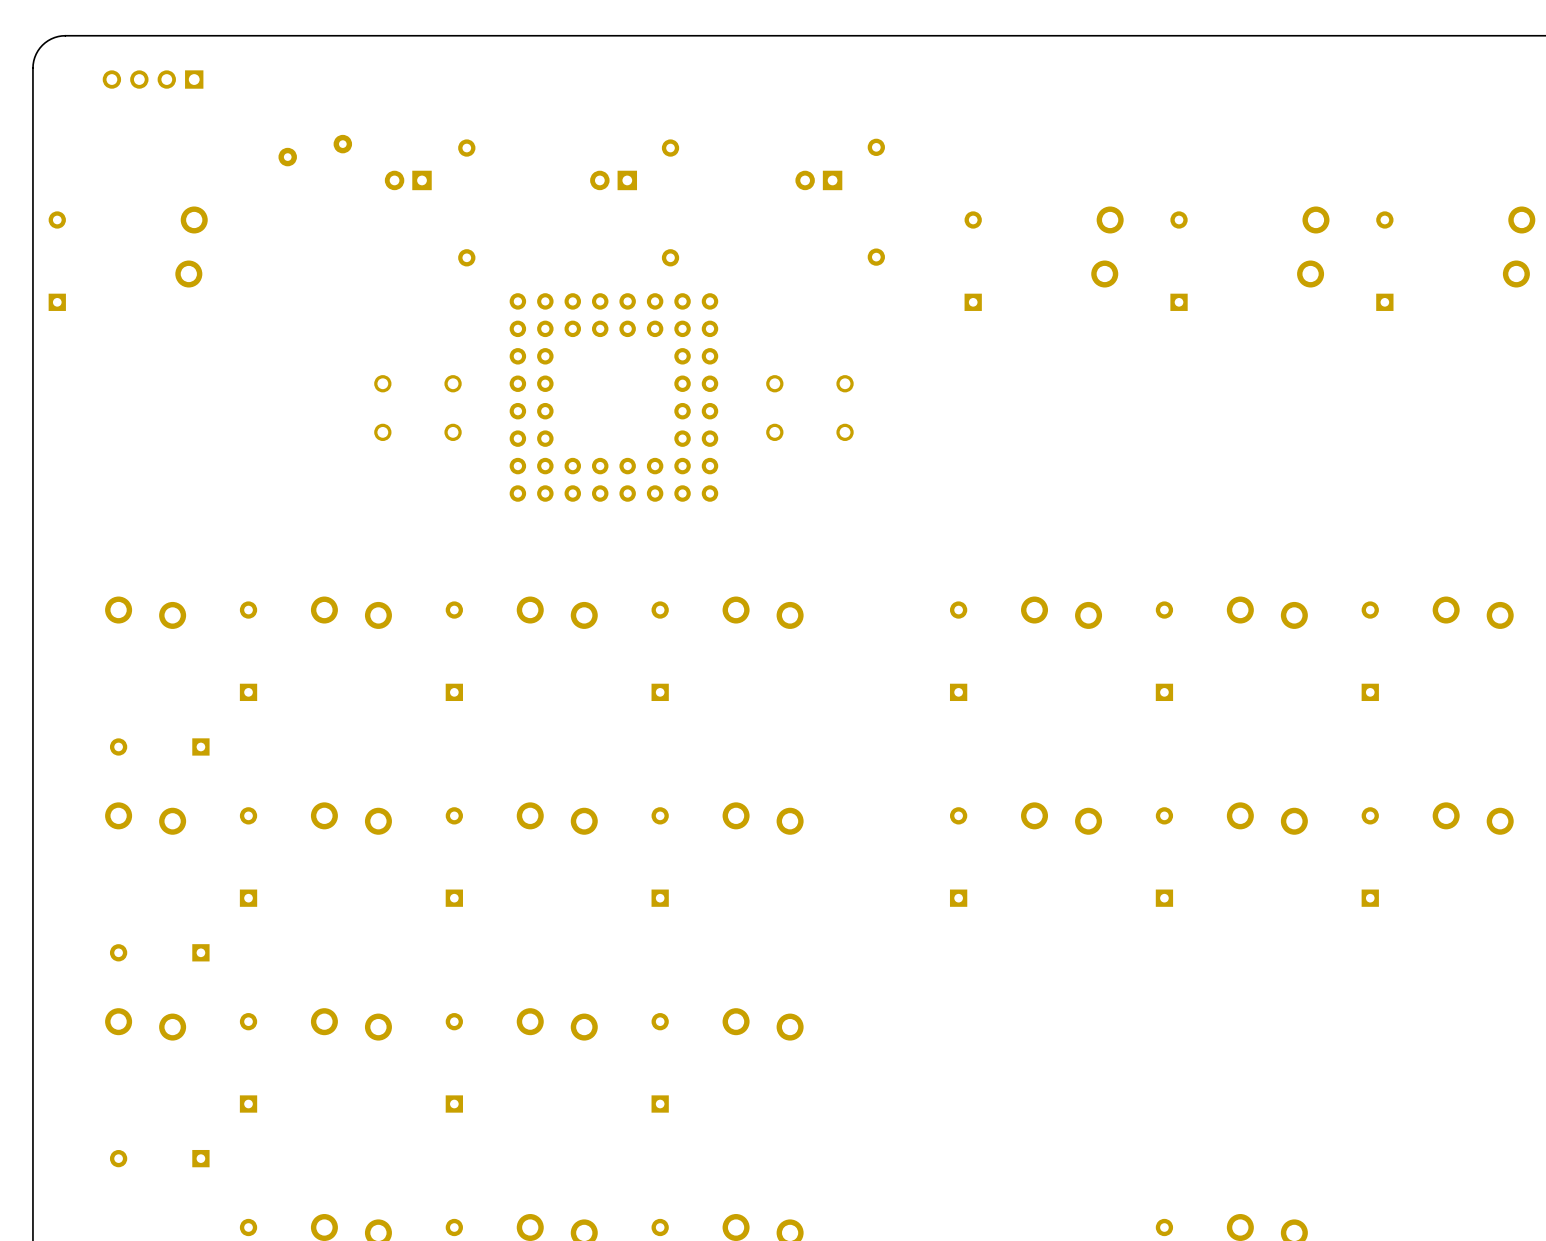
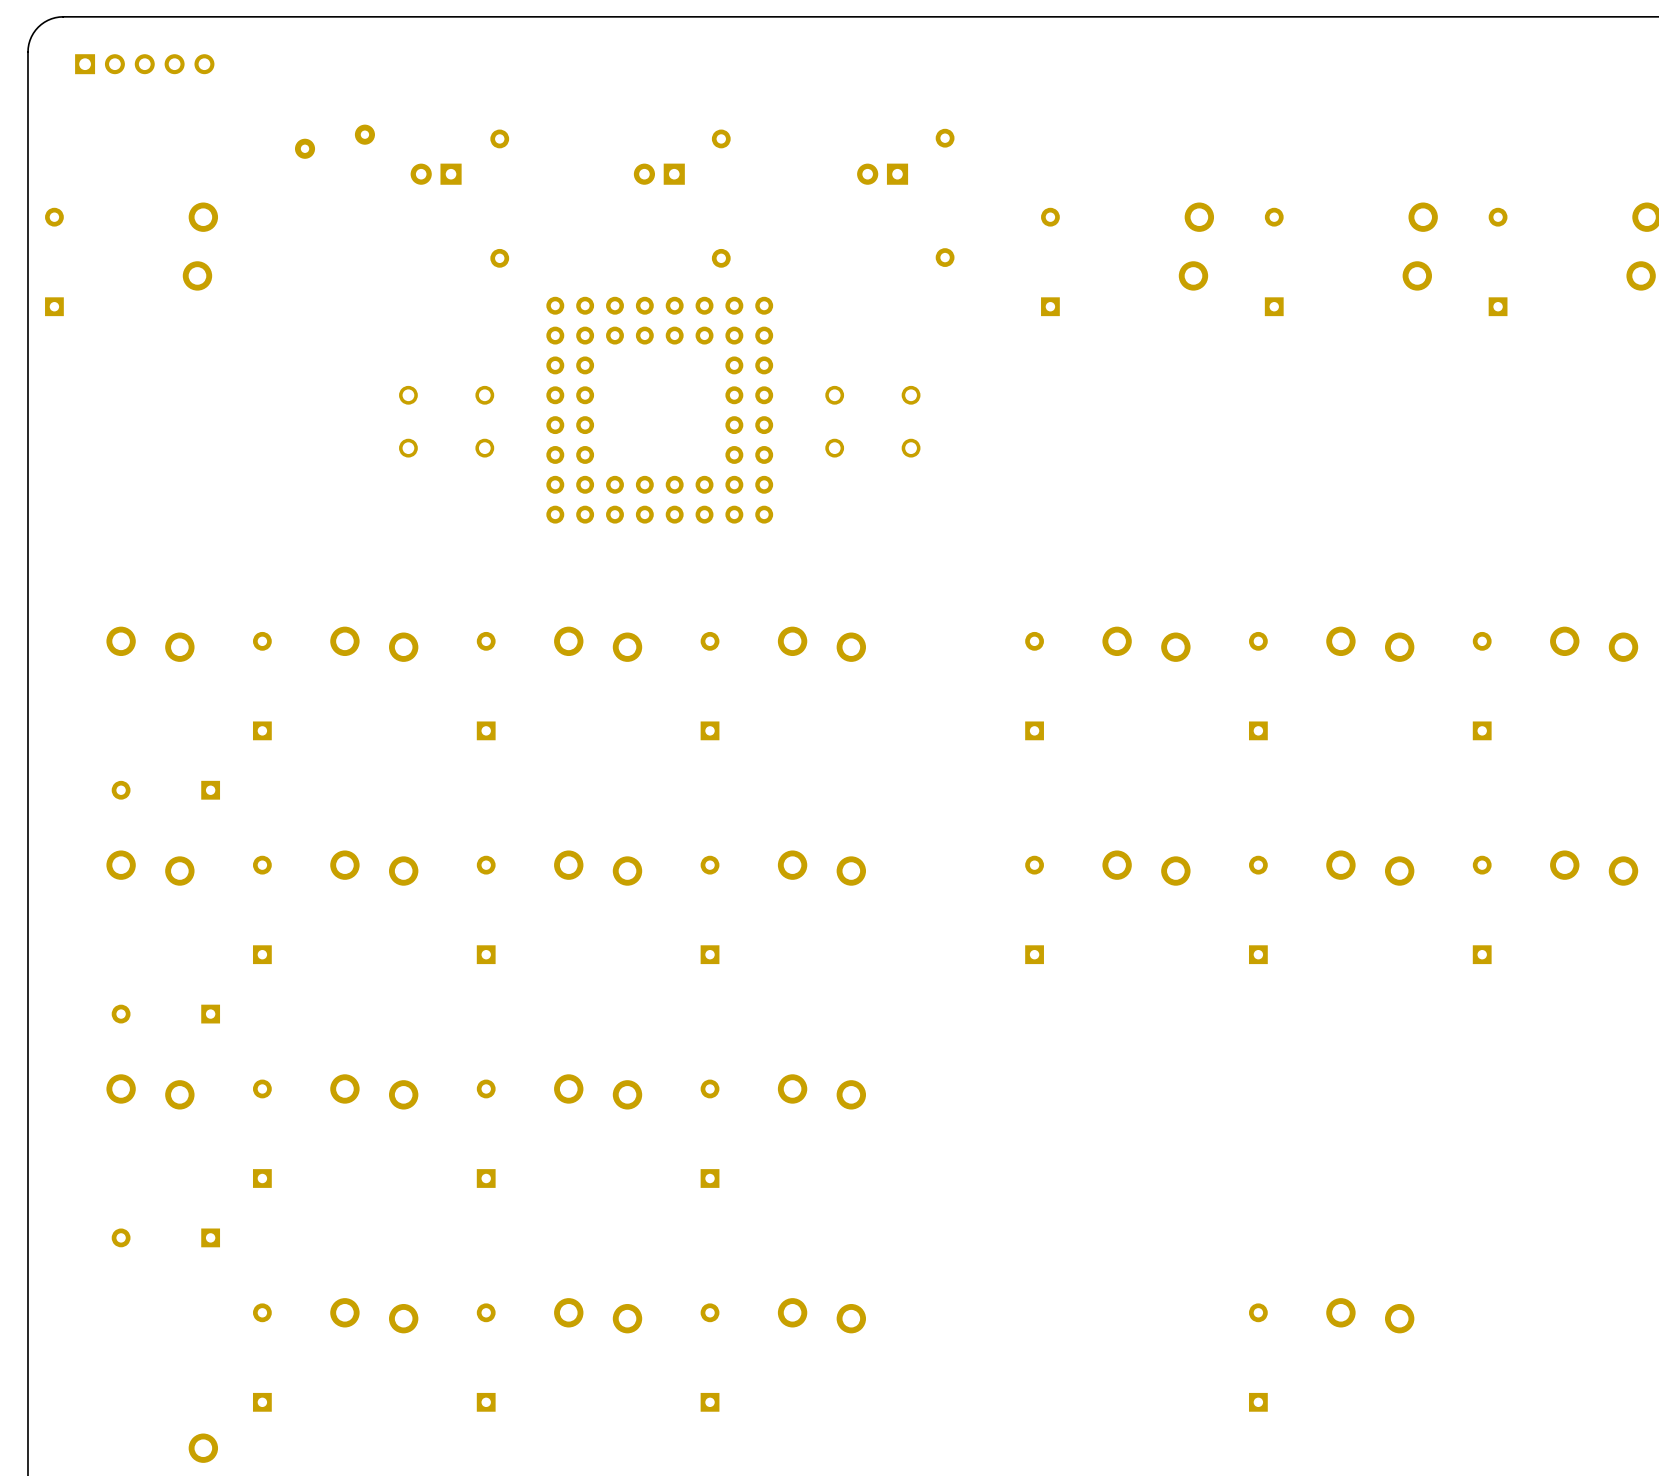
part: none -> (144, 64)
part: (153, 79) -> none

